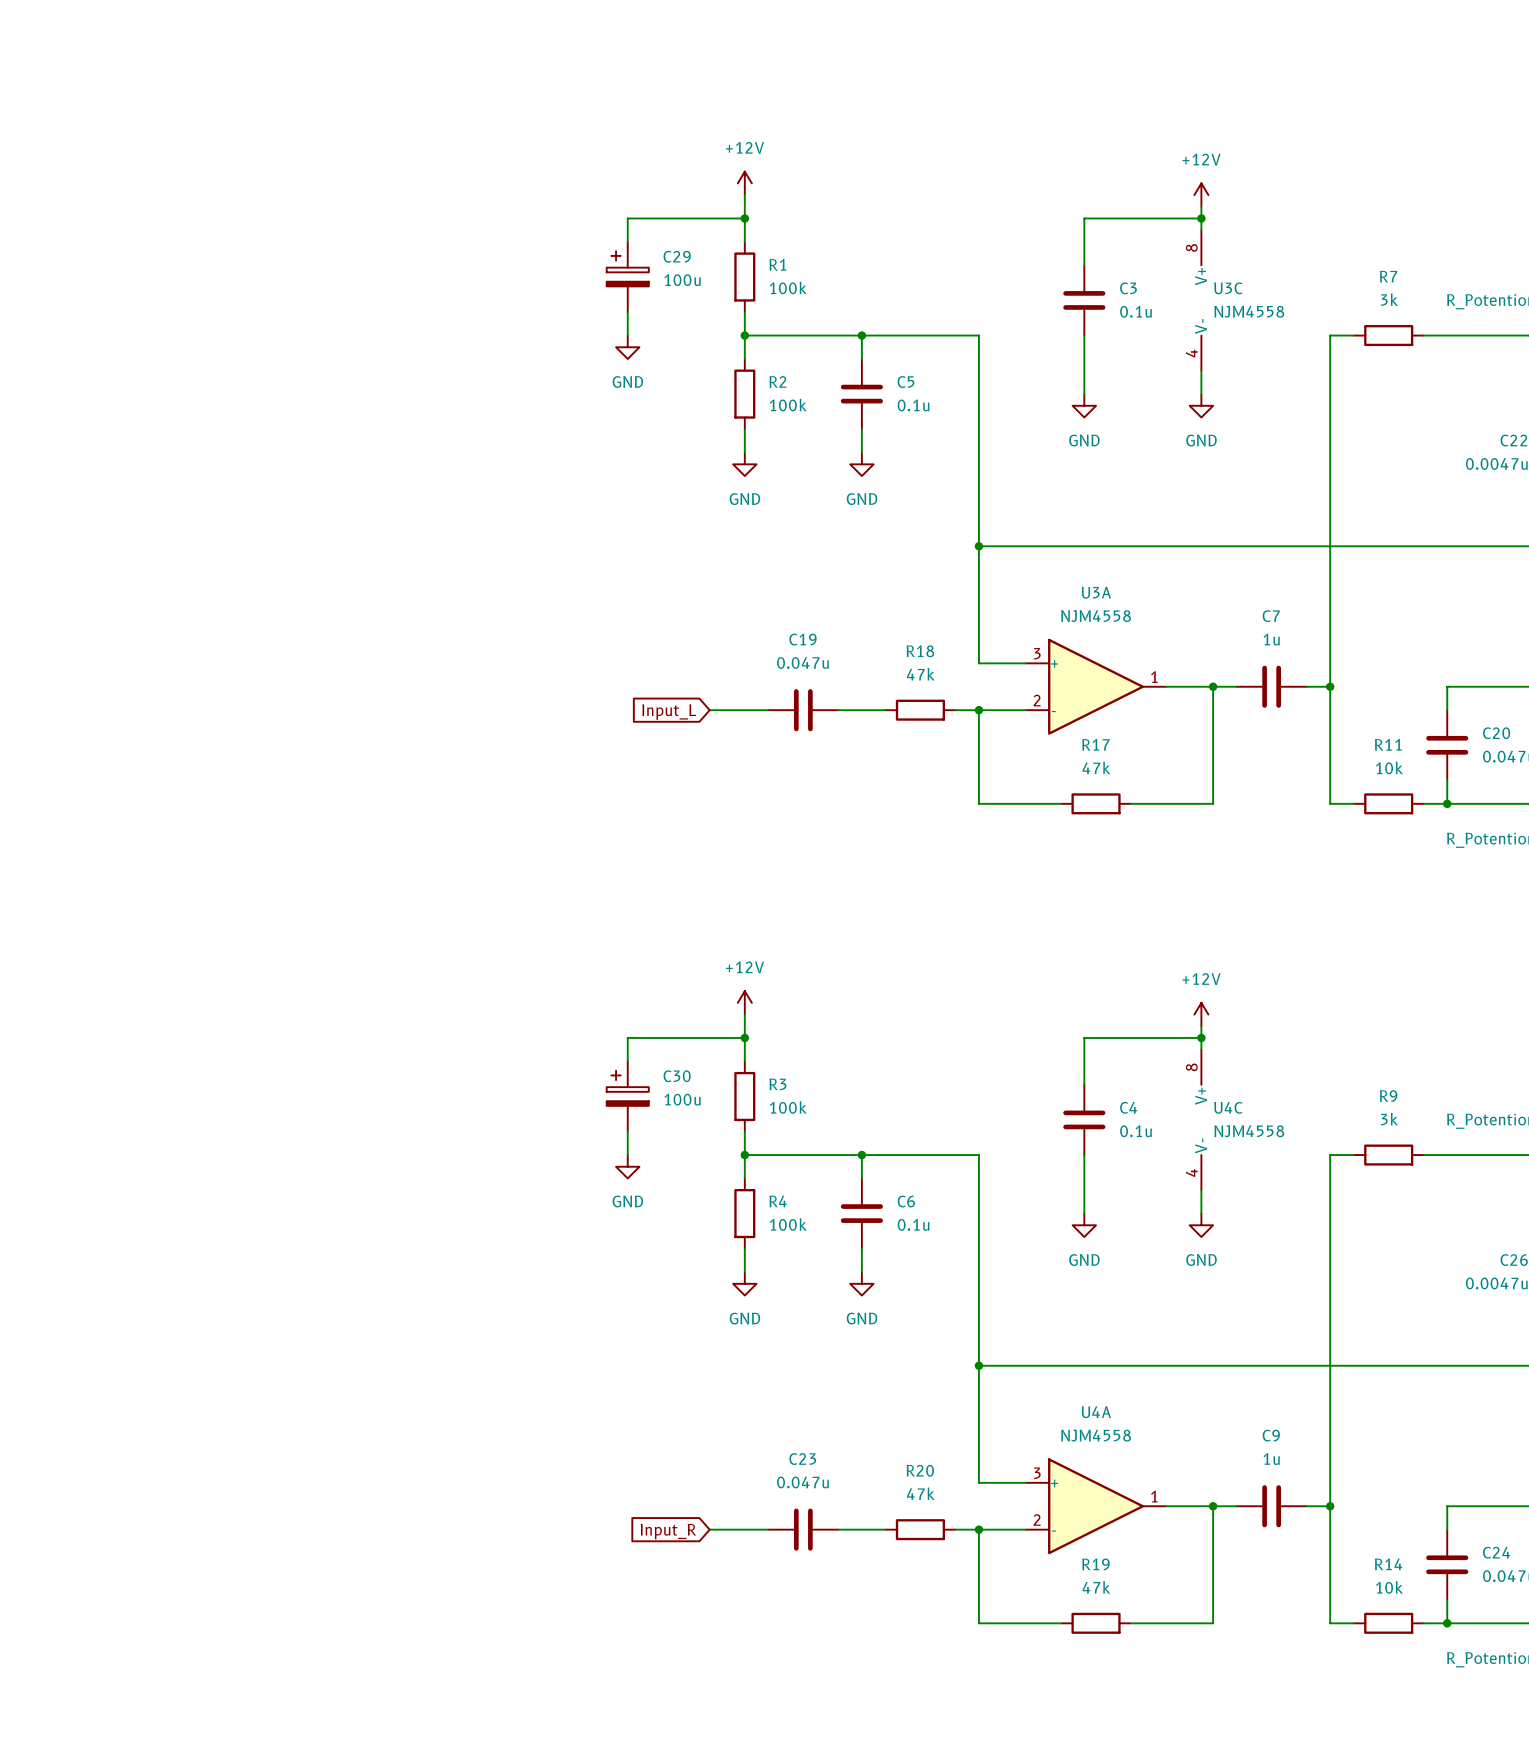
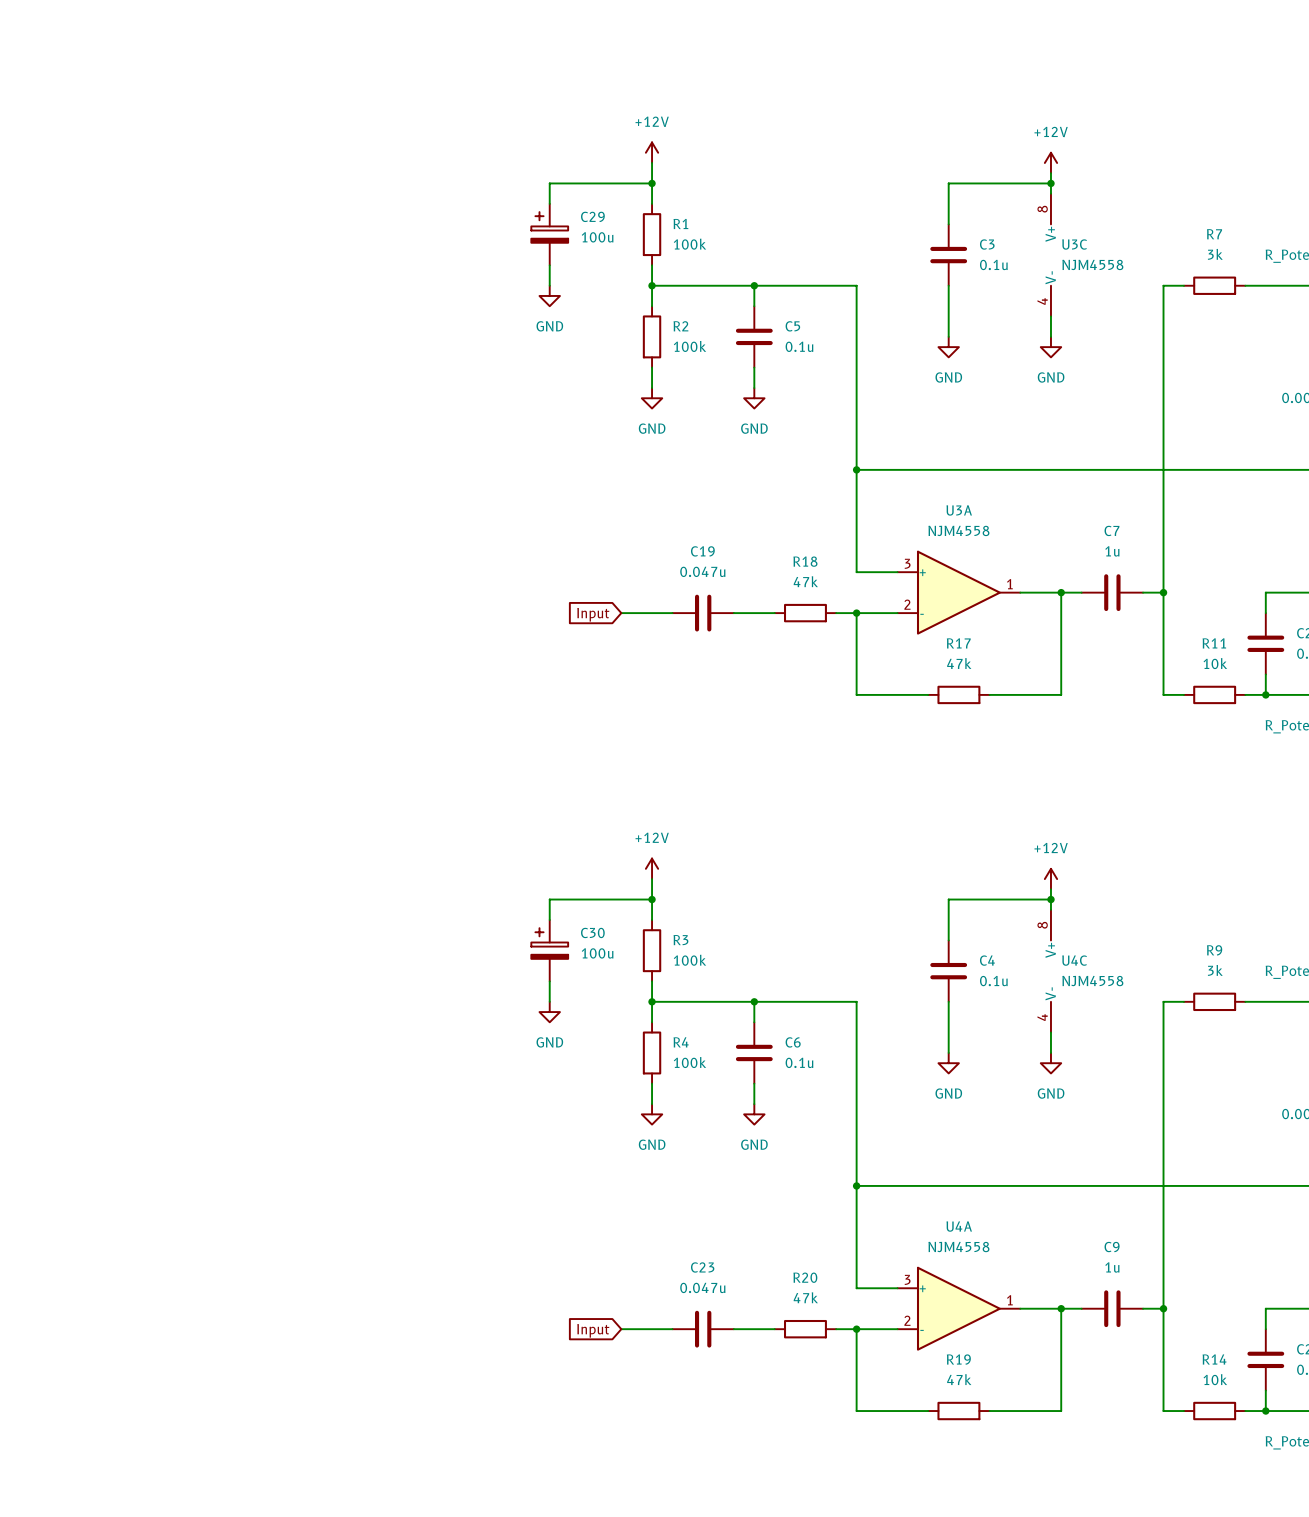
global label: Input_L (669, 712) -> Input (593, 614)
global label: Input_R (668, 1531) -> Input (593, 1330)

